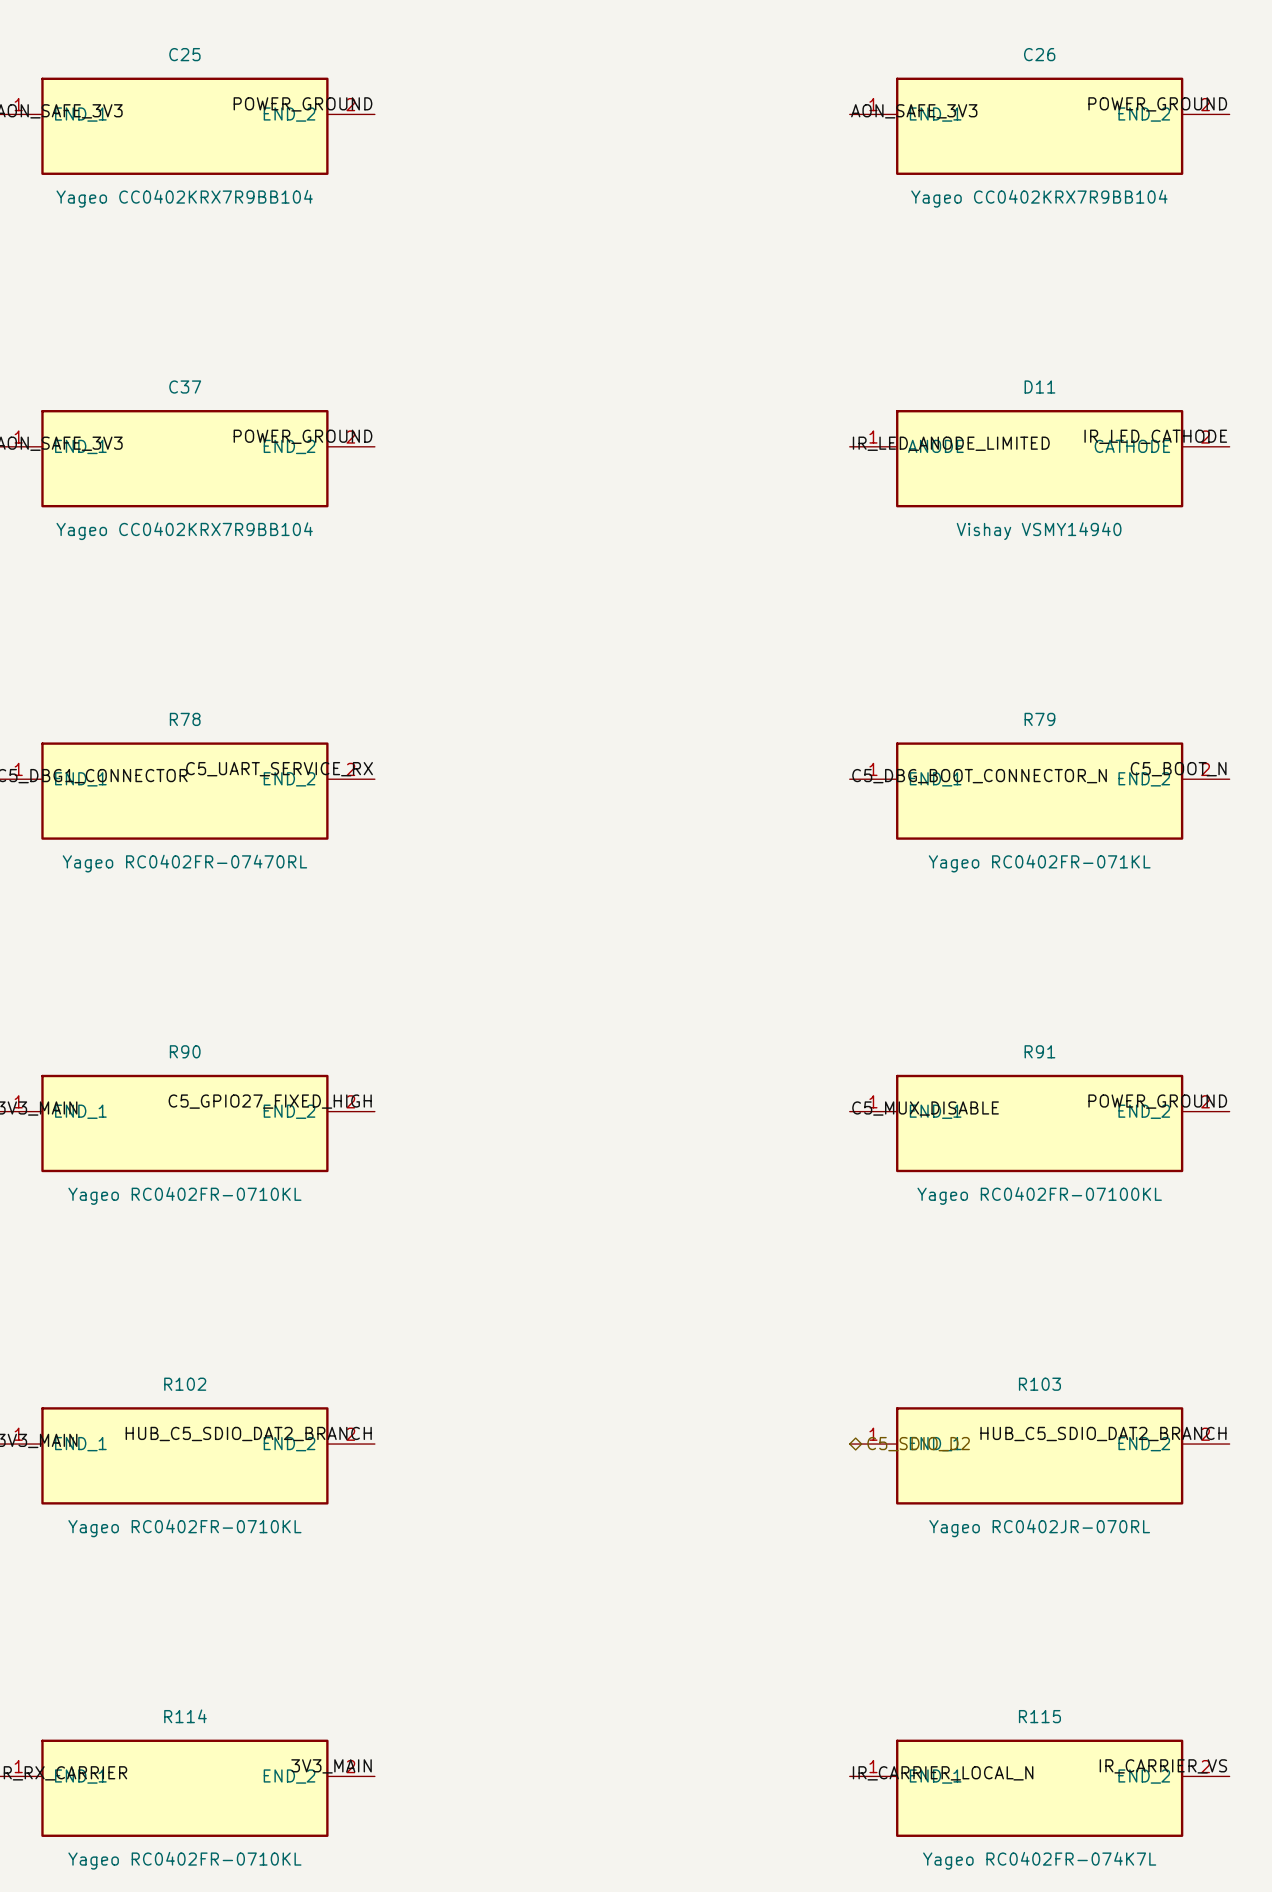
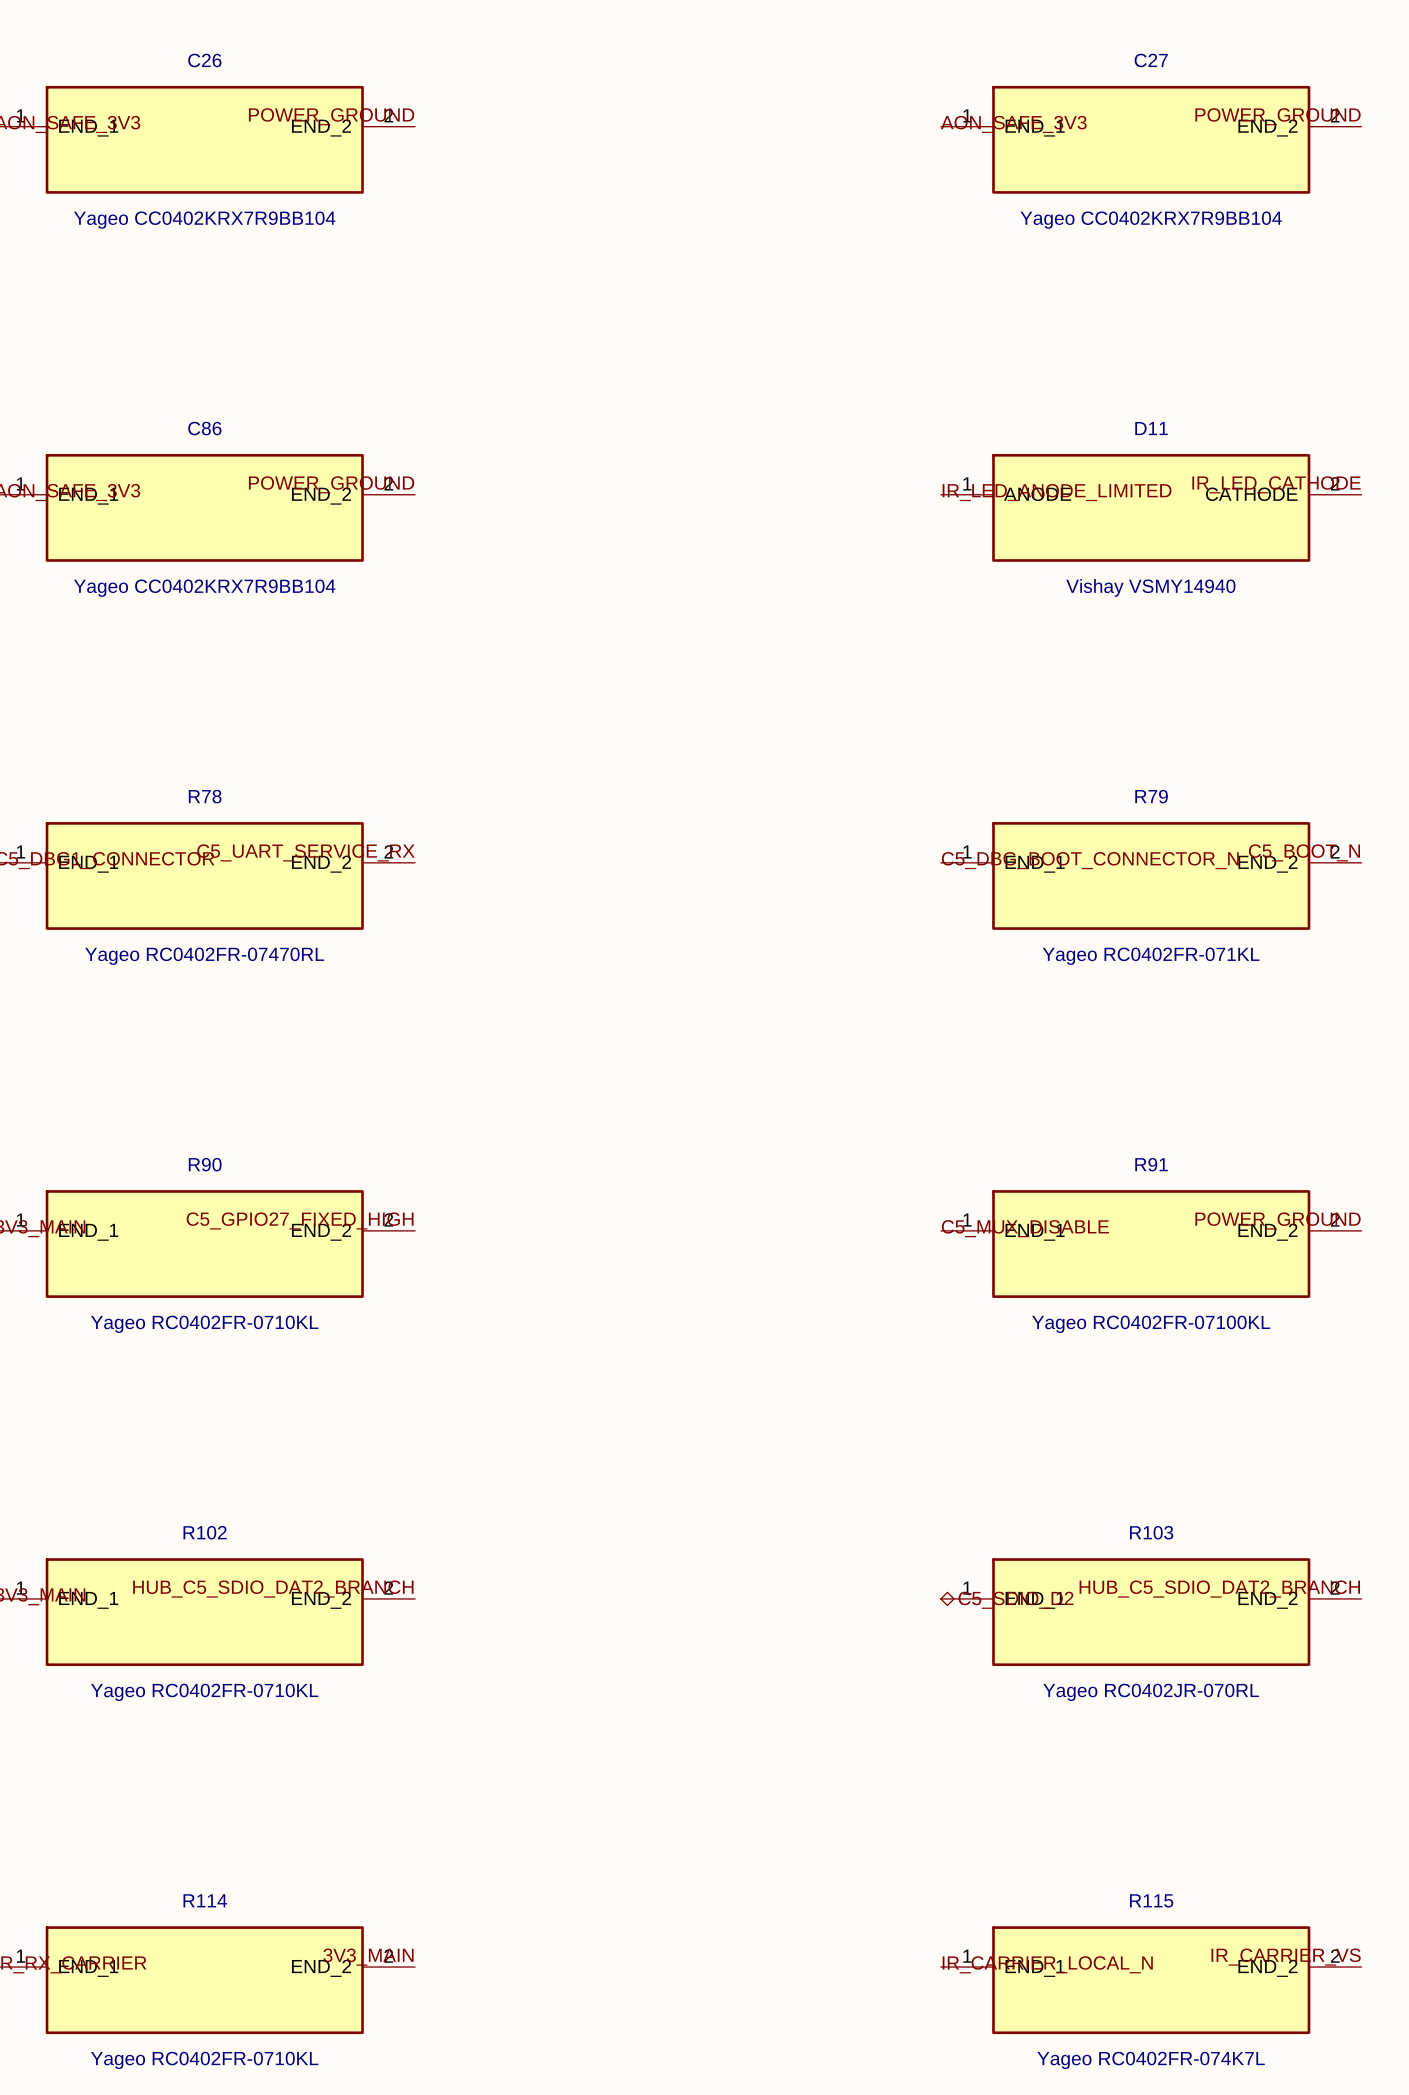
C25 name: C25 (184, 54) -> C26 (204, 60)
C26 name: C26 (1039, 54) -> C27 (1151, 60)
C37 name: C37 (185, 387) -> C86 (204, 428)

